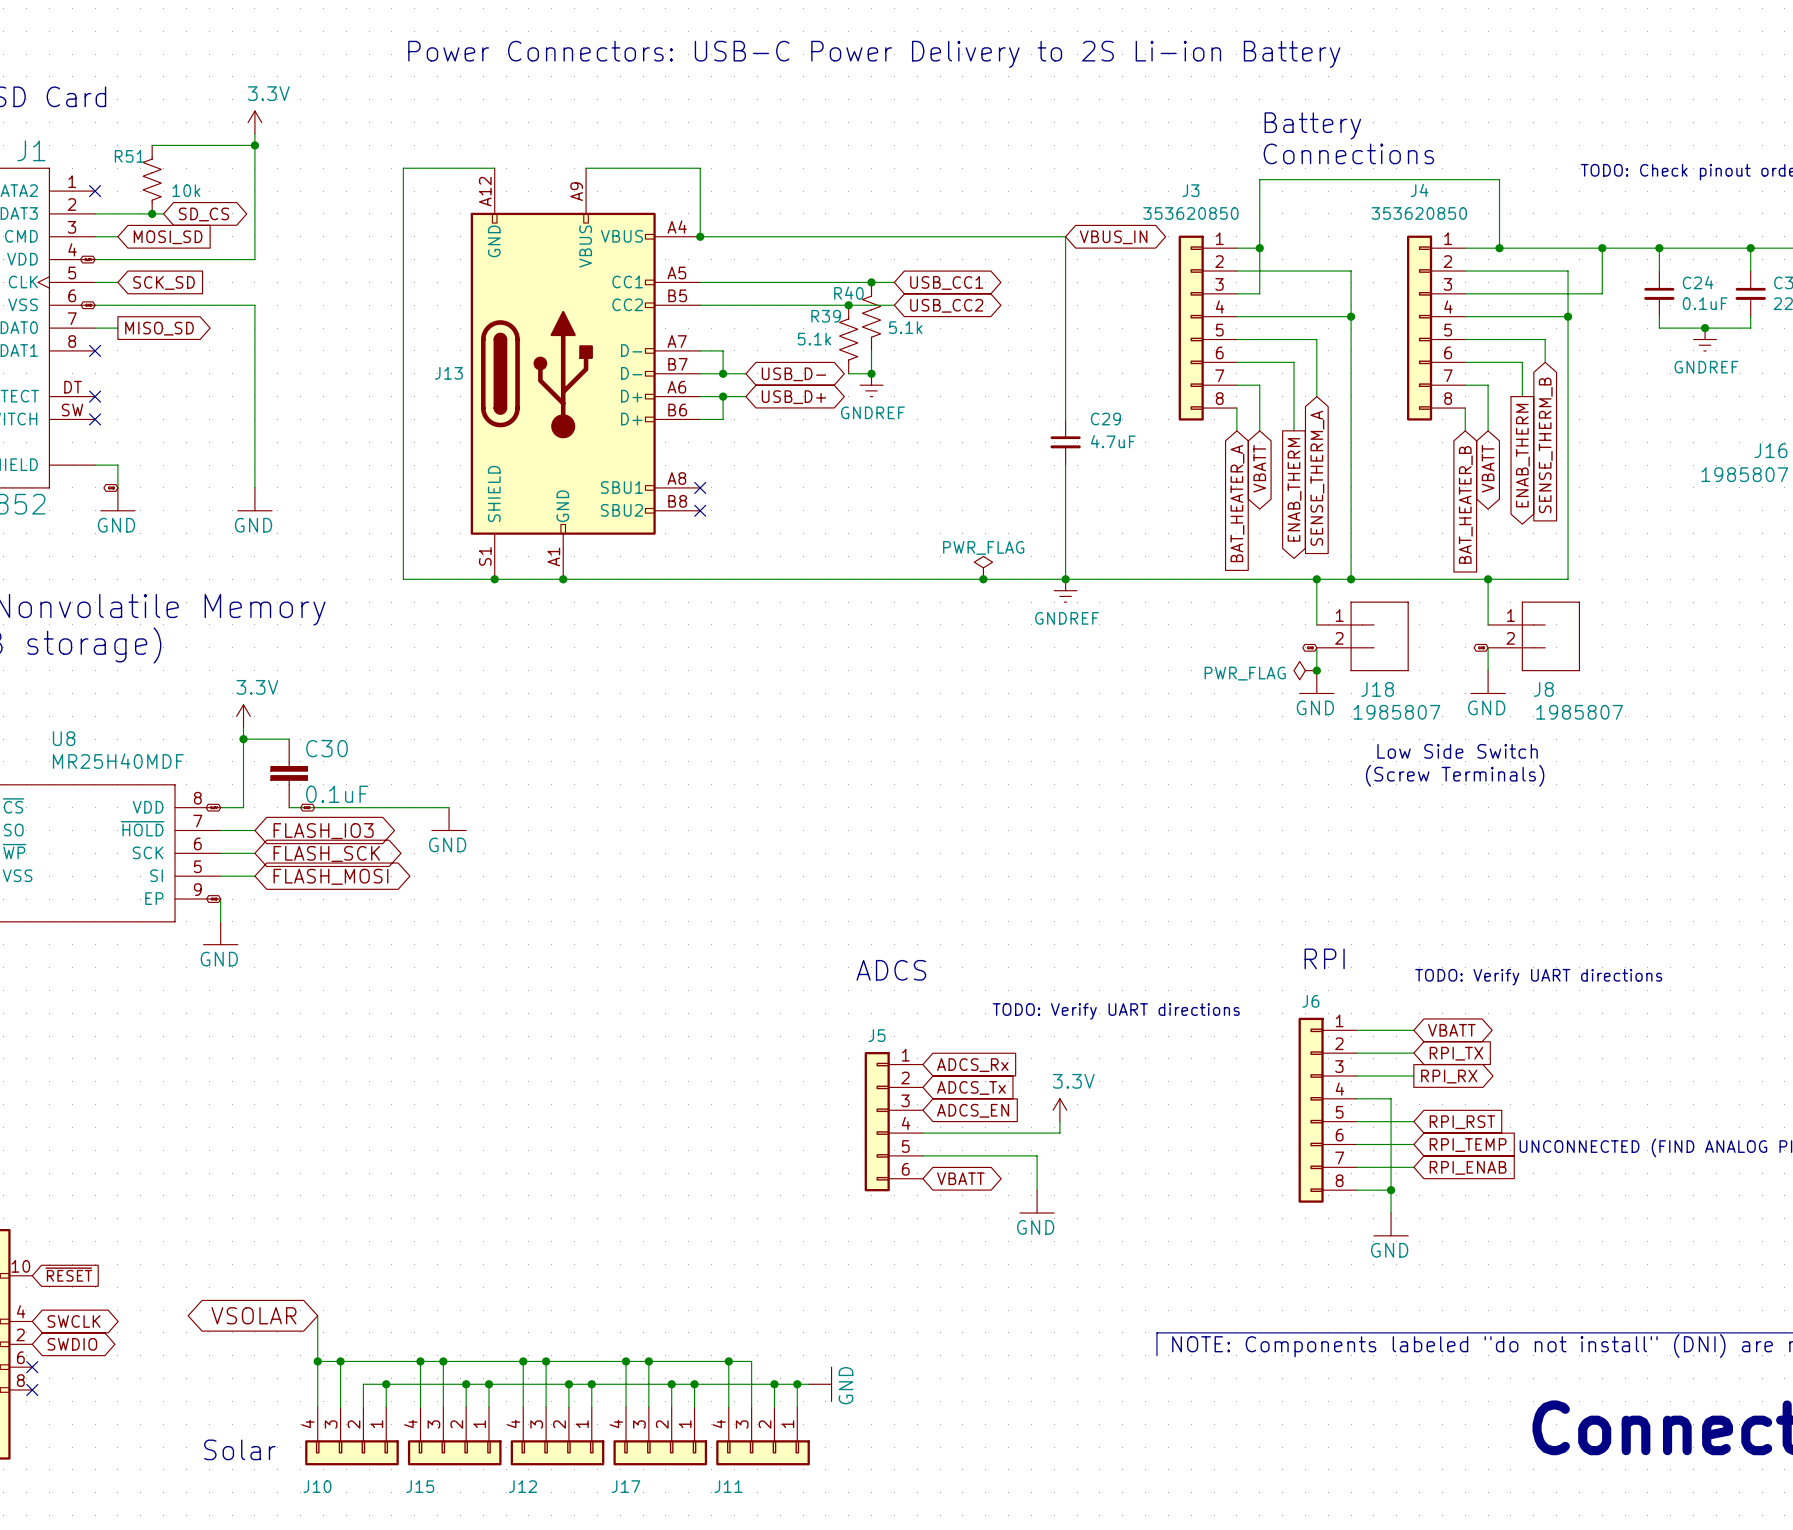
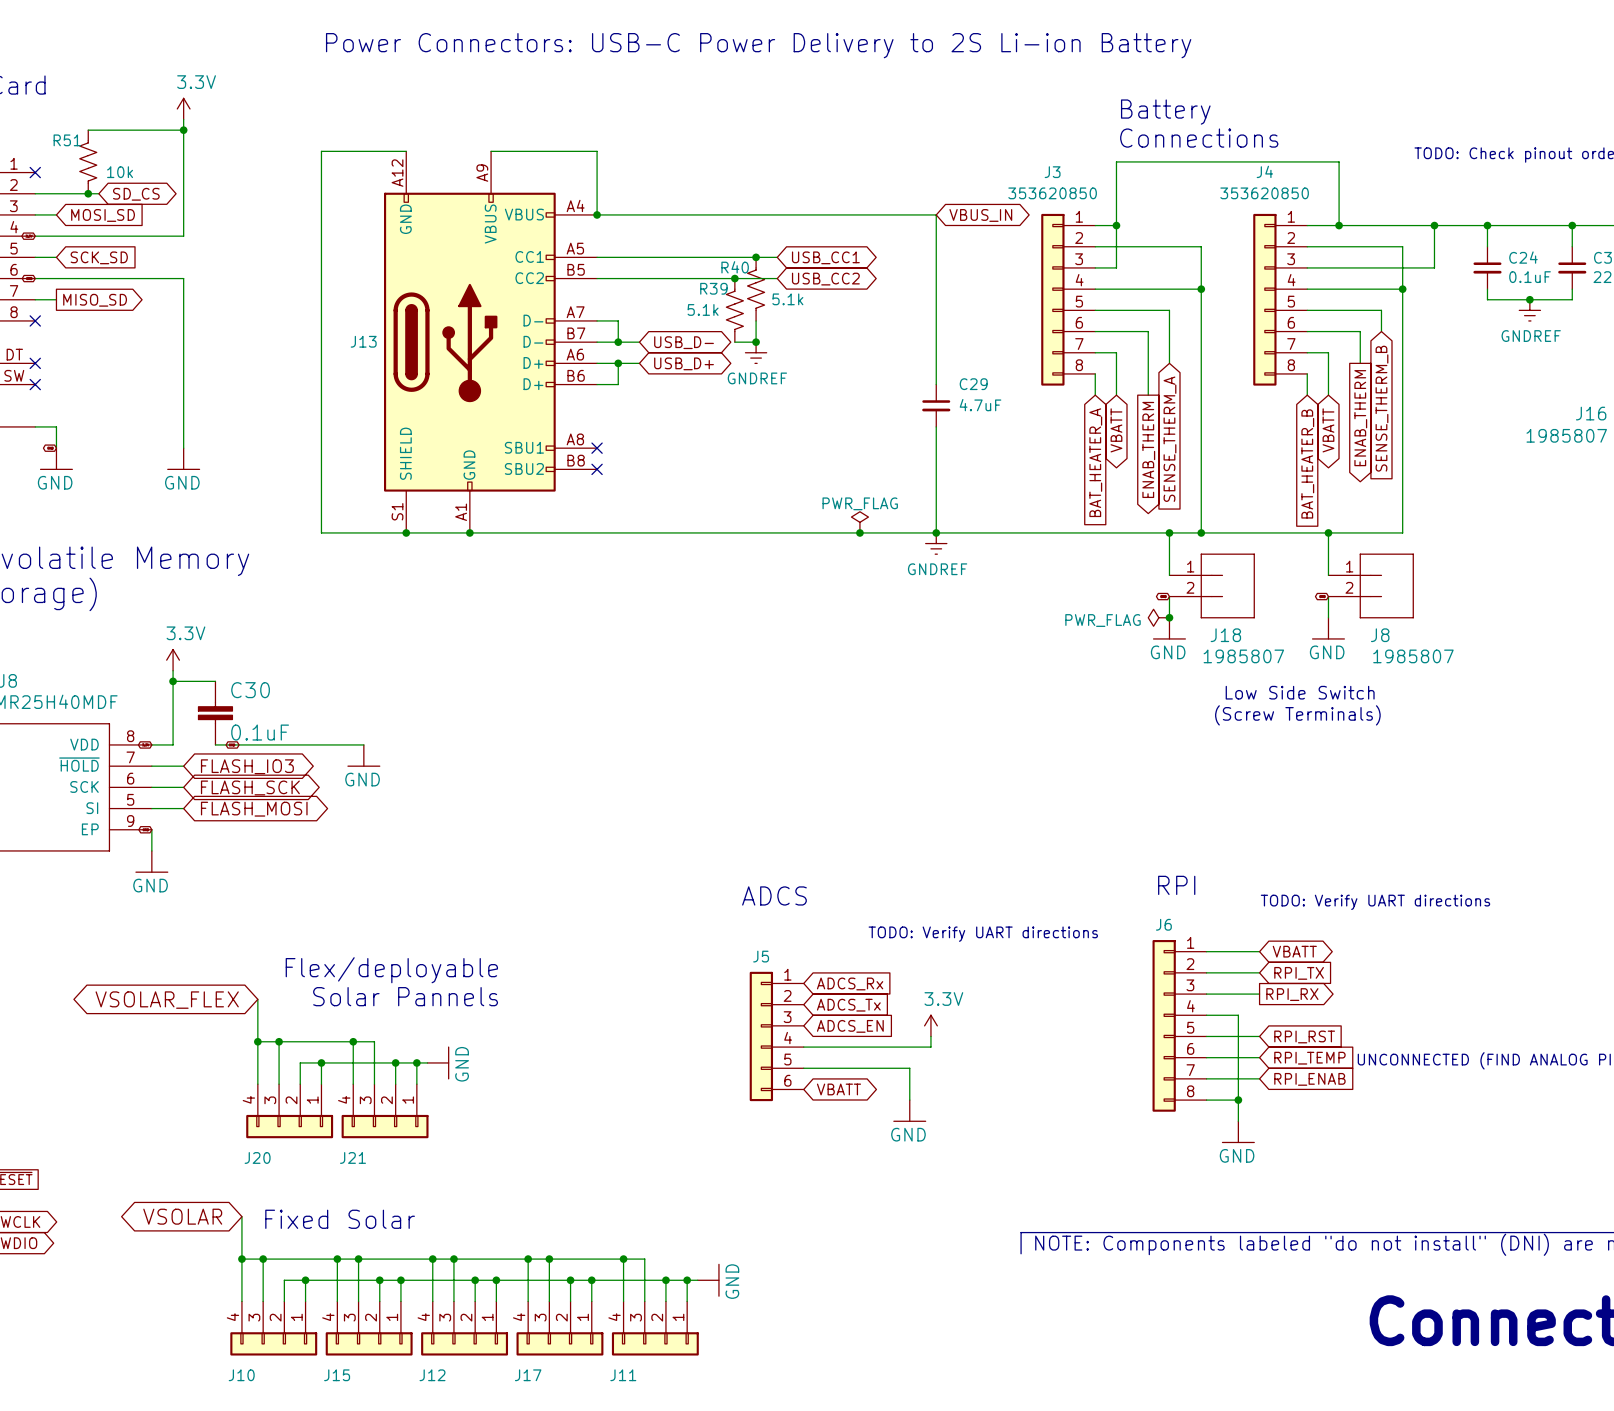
text: none -> Flex/deployable (391, 970)
text: none -> Solar Pannels (405, 996)
wire: none -> (257, 999) (257, 1084)
global label: none -> VSOLAR_FLEX (167, 1000)
wire: none -> (257, 1041) (374, 1041) (374, 1084)
junction: none -> (257, 1041)
wire: none -> (279, 1041) (279, 1084)
junction: none -> (279, 1041)
wire: none -> (353, 1041) (353, 1084)
junction: none -> (353, 1041)
wire: none -> (321, 1062) (321, 1084)
junction: none -> (321, 1062)
wire: none -> (395, 1062) (395, 1084)
junction: none -> (395, 1062)
wire: none -> (416, 1062) (416, 1084)
junction: none -> (416, 1062)
wire: none -> (427, 1062) (300, 1062) (300, 1084)
power symbol: none -> GND (438, 1062)
J20: none -> (289, 1111)
J21: none -> (385, 1111)
text: none -> Fixed Solar (340, 1219)
text: Solar (239, 1449) -> none

